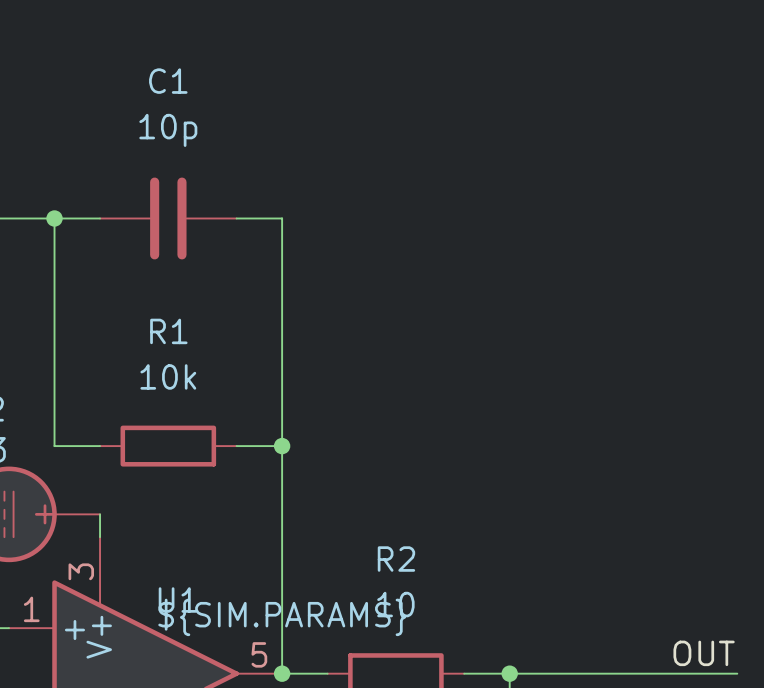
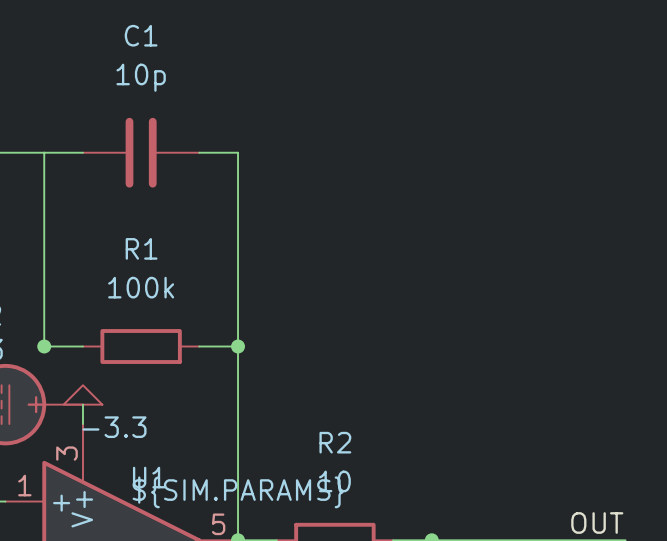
junction: (54, 218) -> none
R1 value: 10k (168, 376) -> 100k (141, 287)
junction: none -> (44, 346)
power symbol: none -> -3.3 (82, 394)

